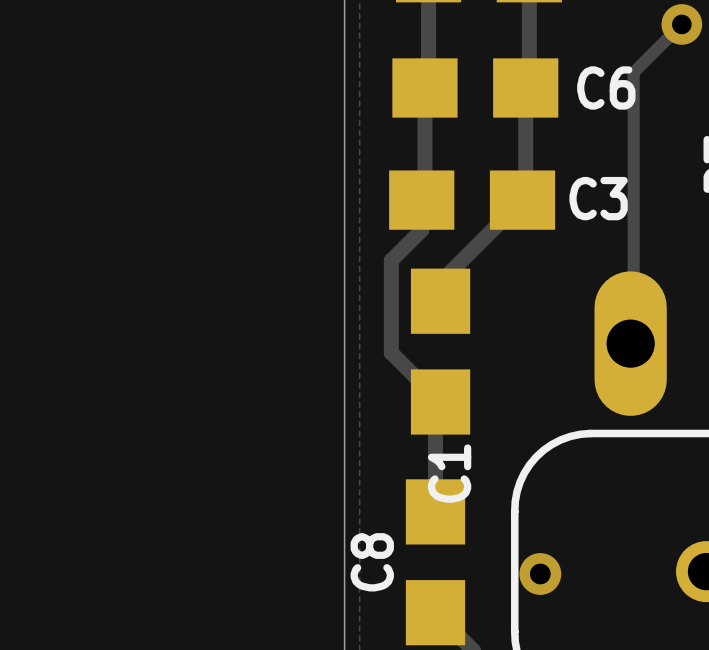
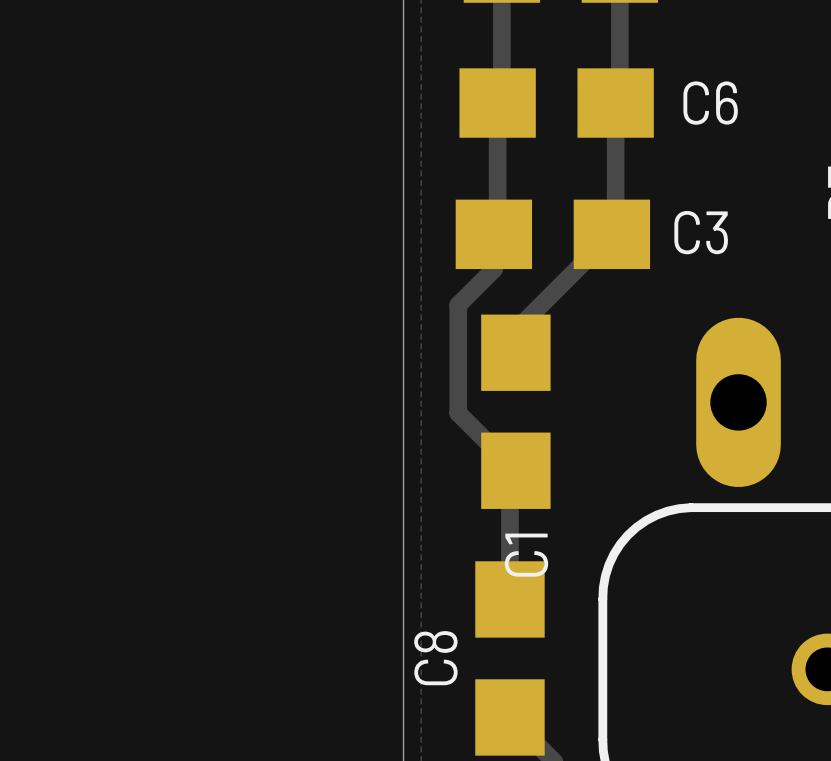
track: (681, 24) (633, 72) (633, 337) (630, 343) -> none
via: (681, 24) -> none
via: (540, 573) -> none

